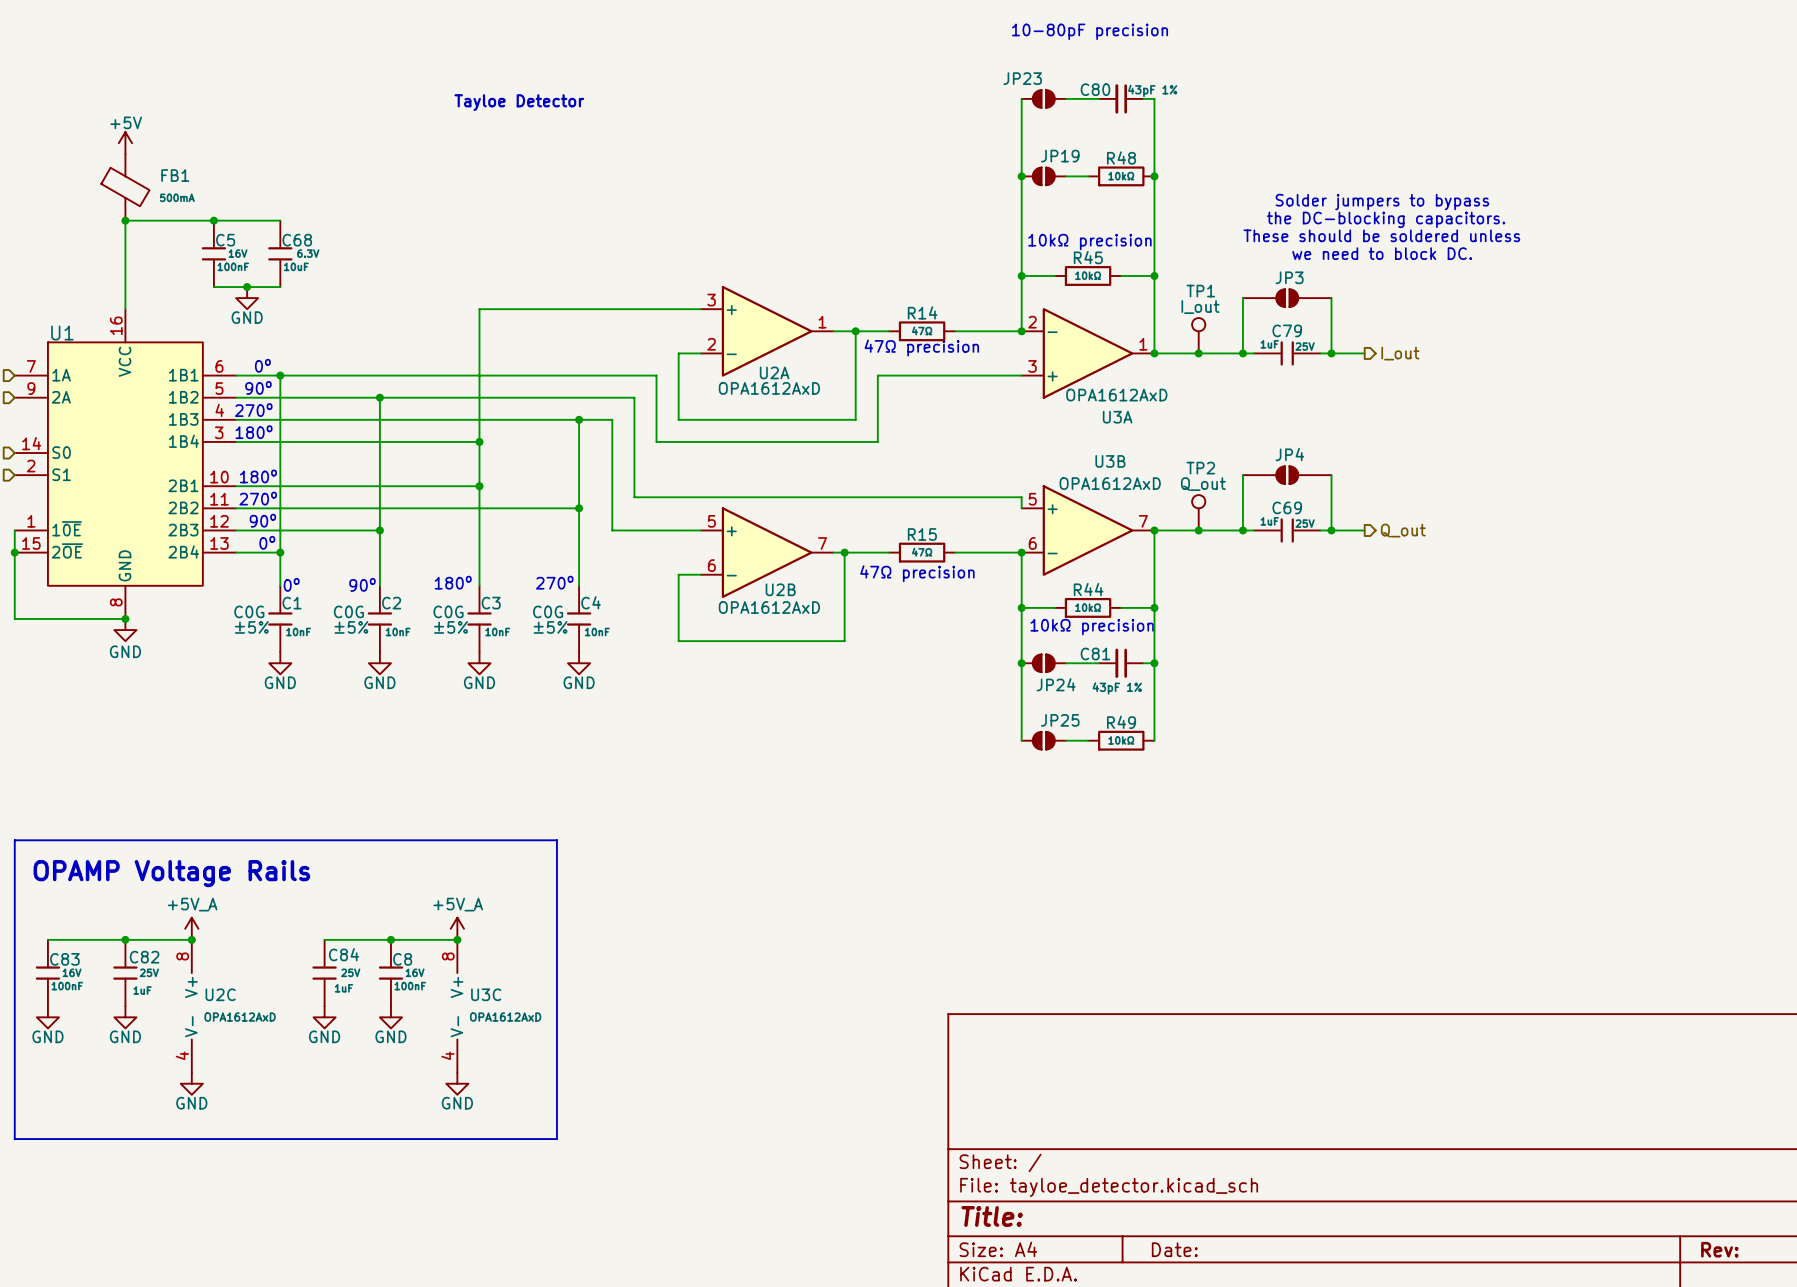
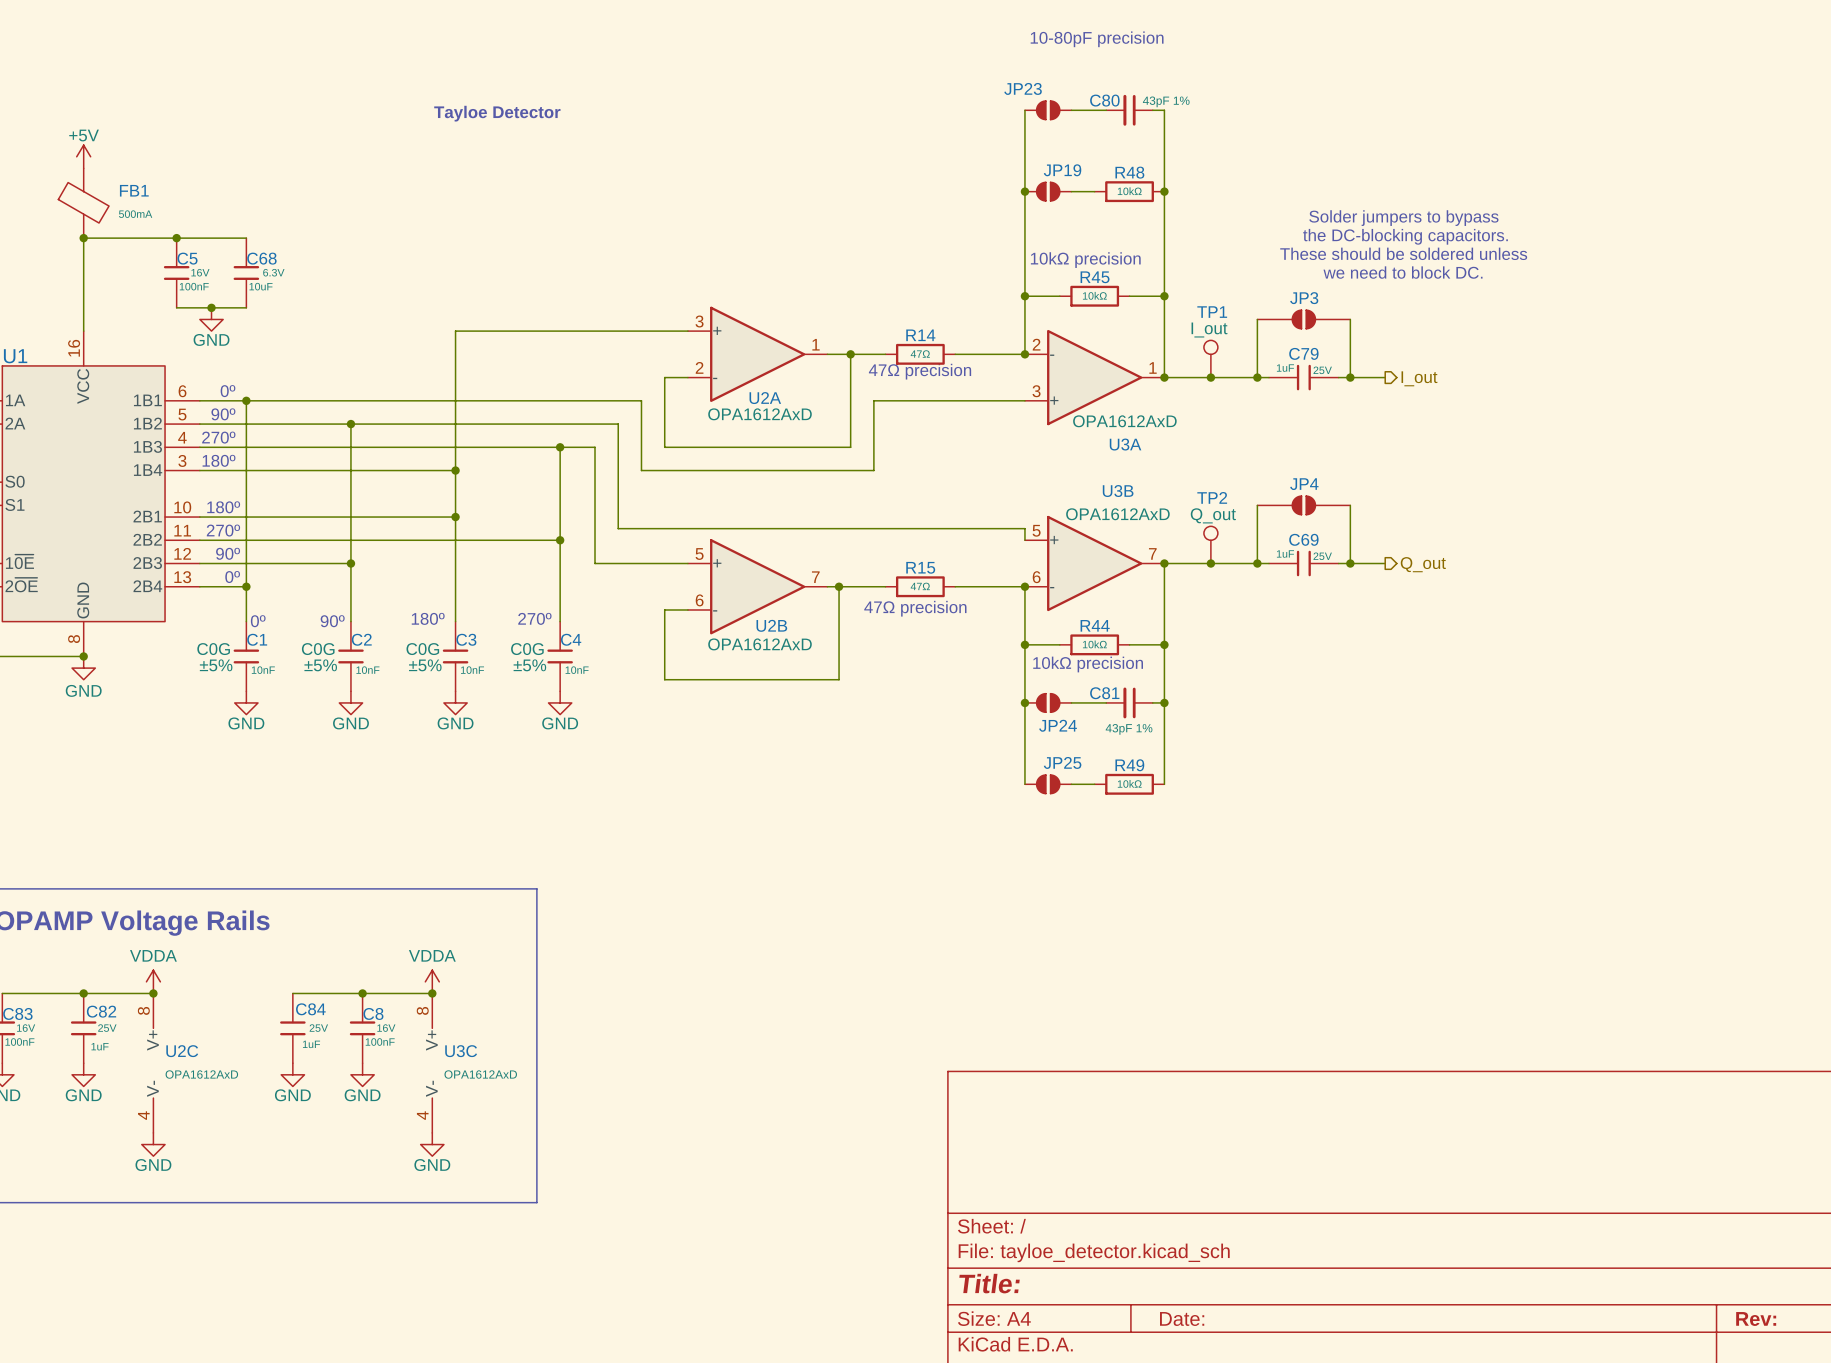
power symbol: +5V_A (191, 928) -> VDDA (153, 981)
power symbol: +5V_A (457, 928) -> VDDA (432, 981)

